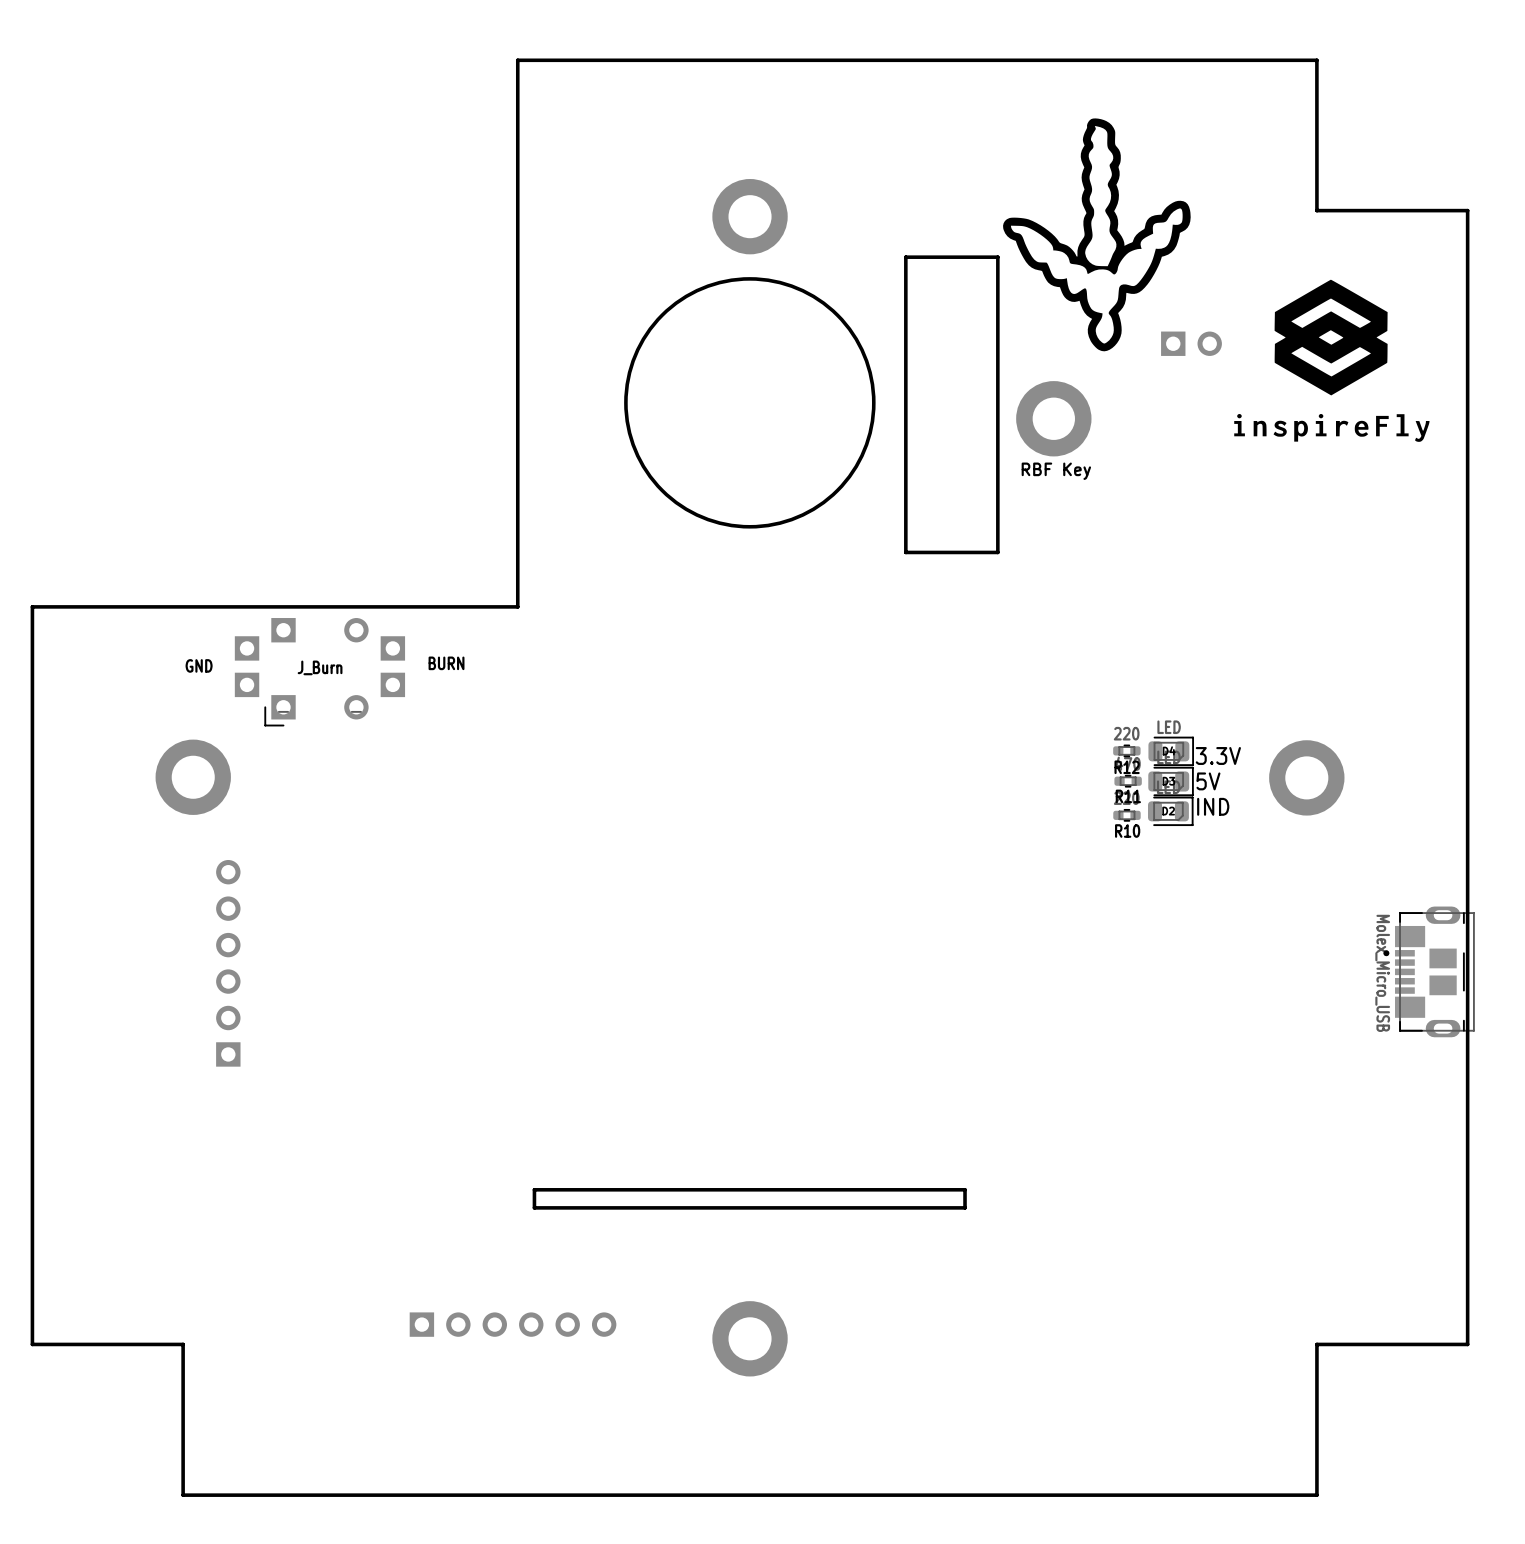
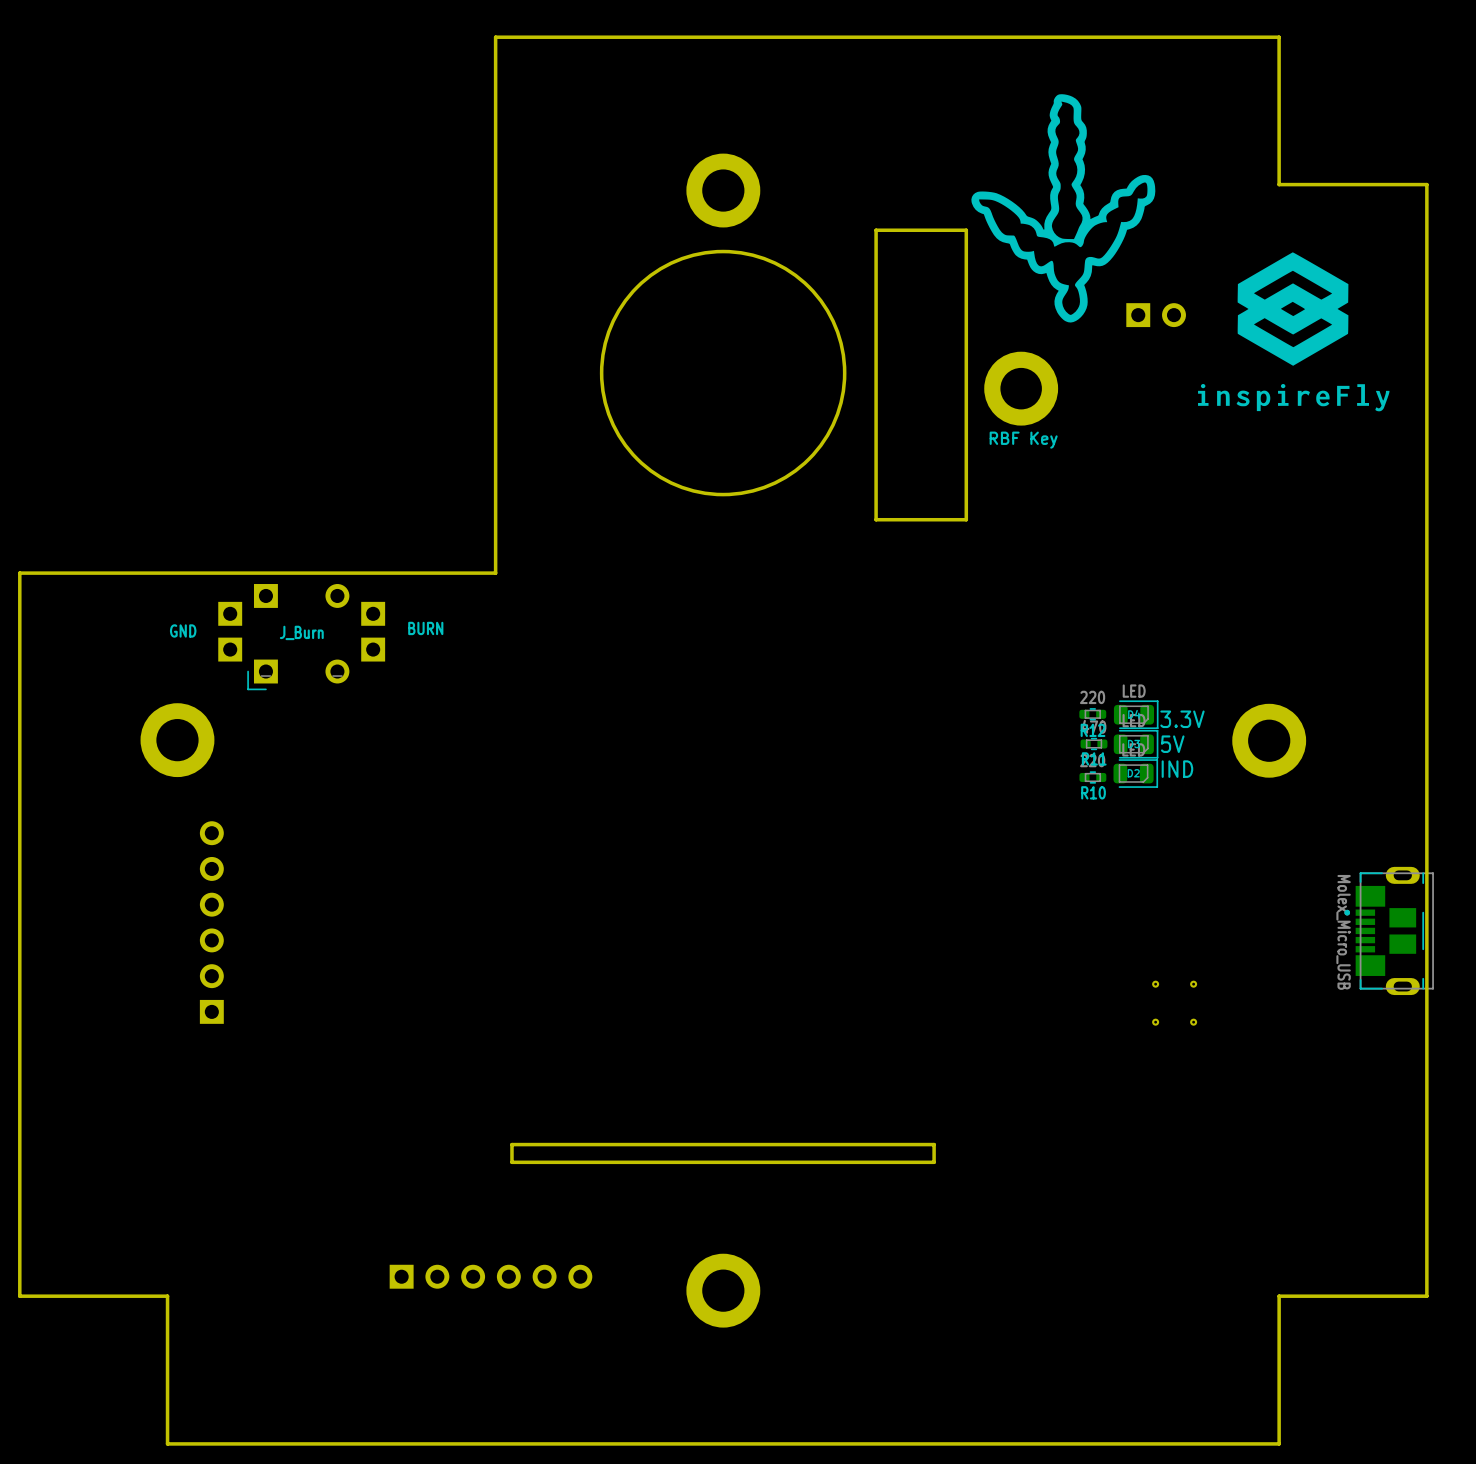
part: none -> (1174, 1003)

